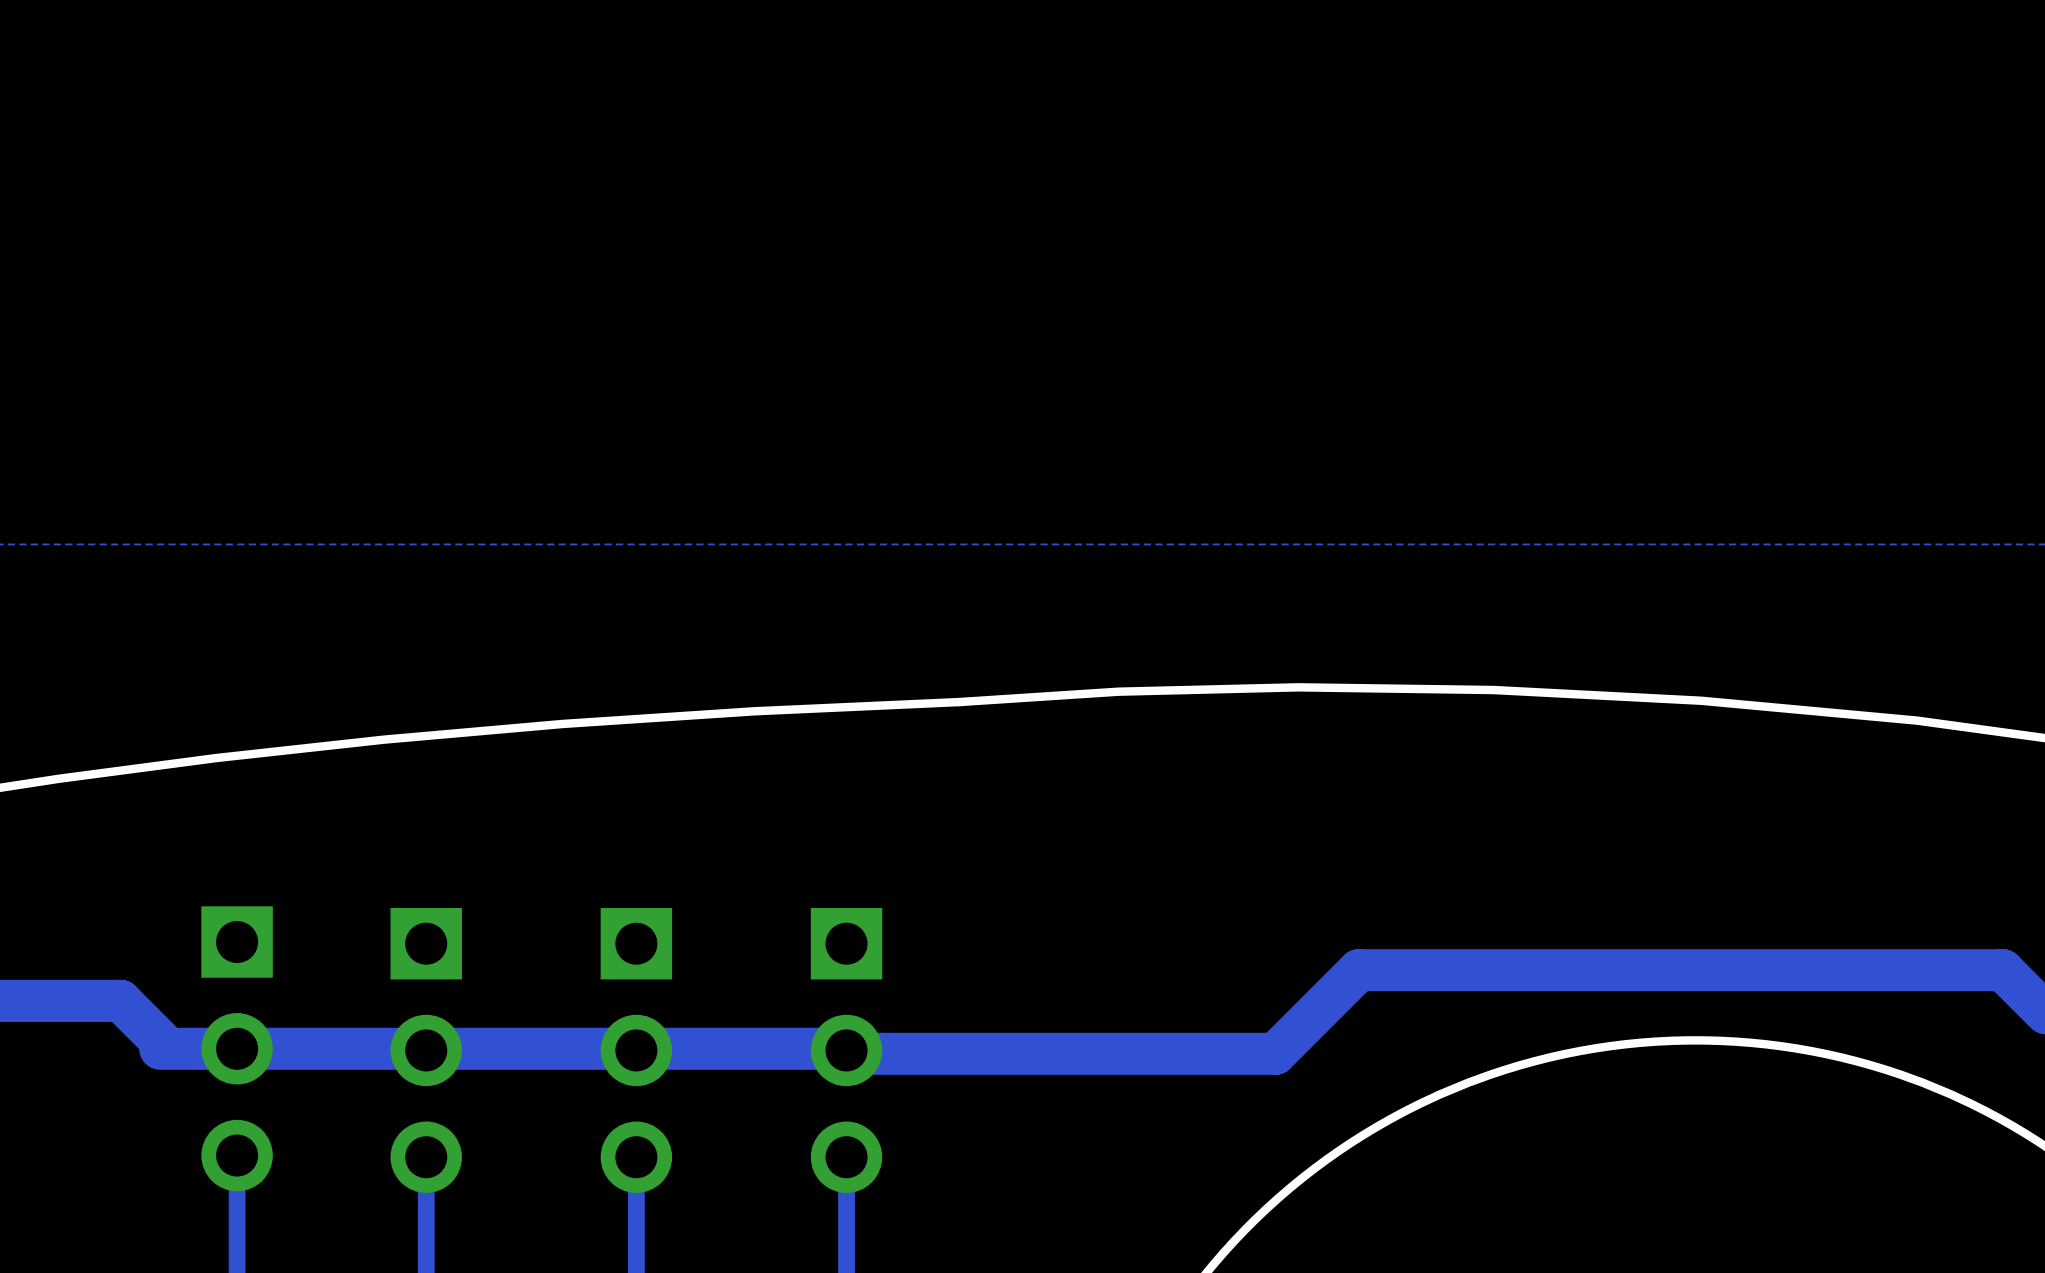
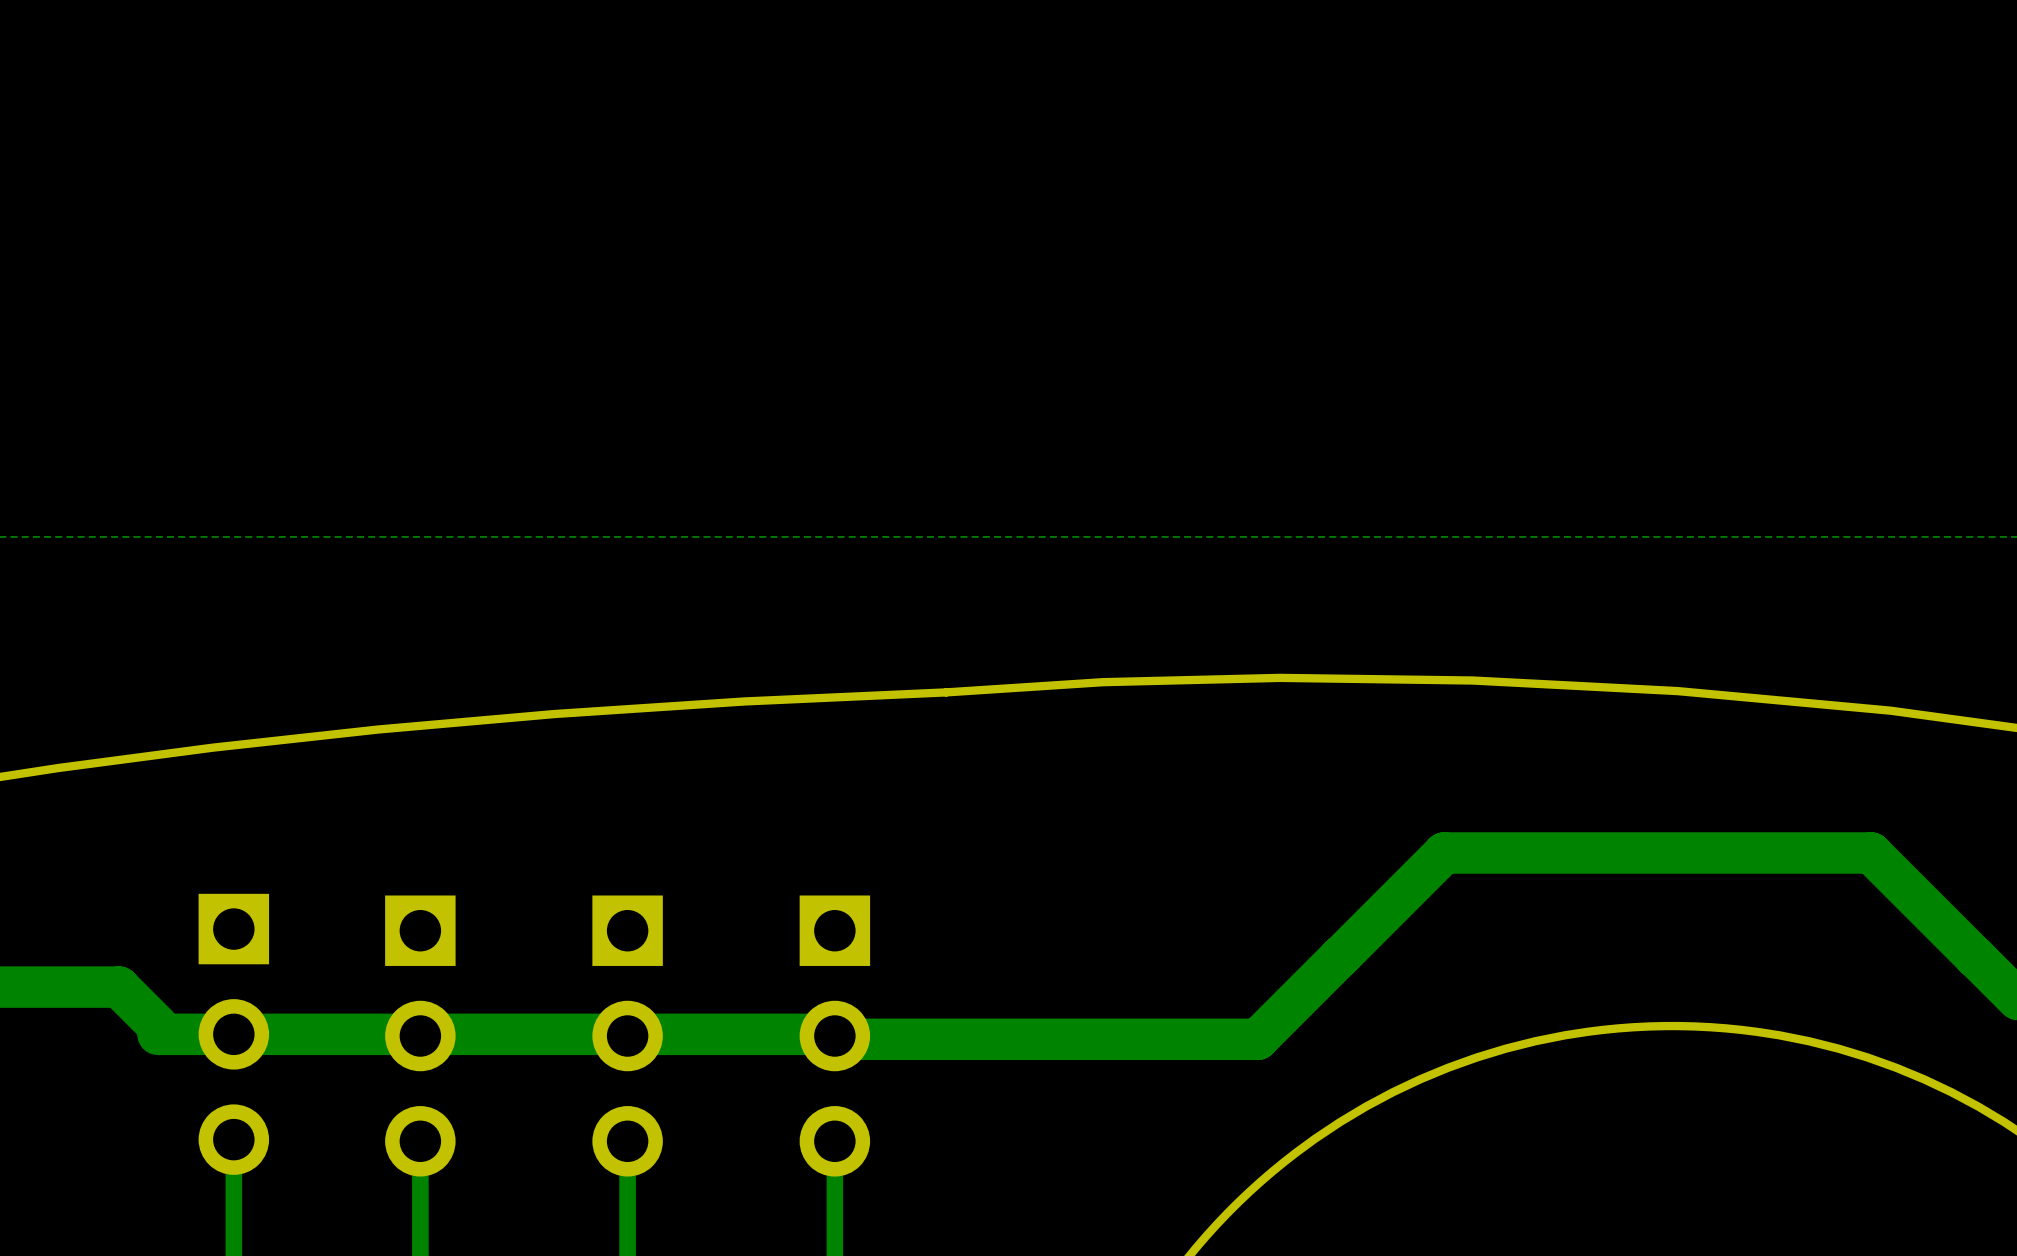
track: (2002, 970) (1359, 970) -> (1975, 956) (1871, 853) (1444, 853) (1340, 956)

